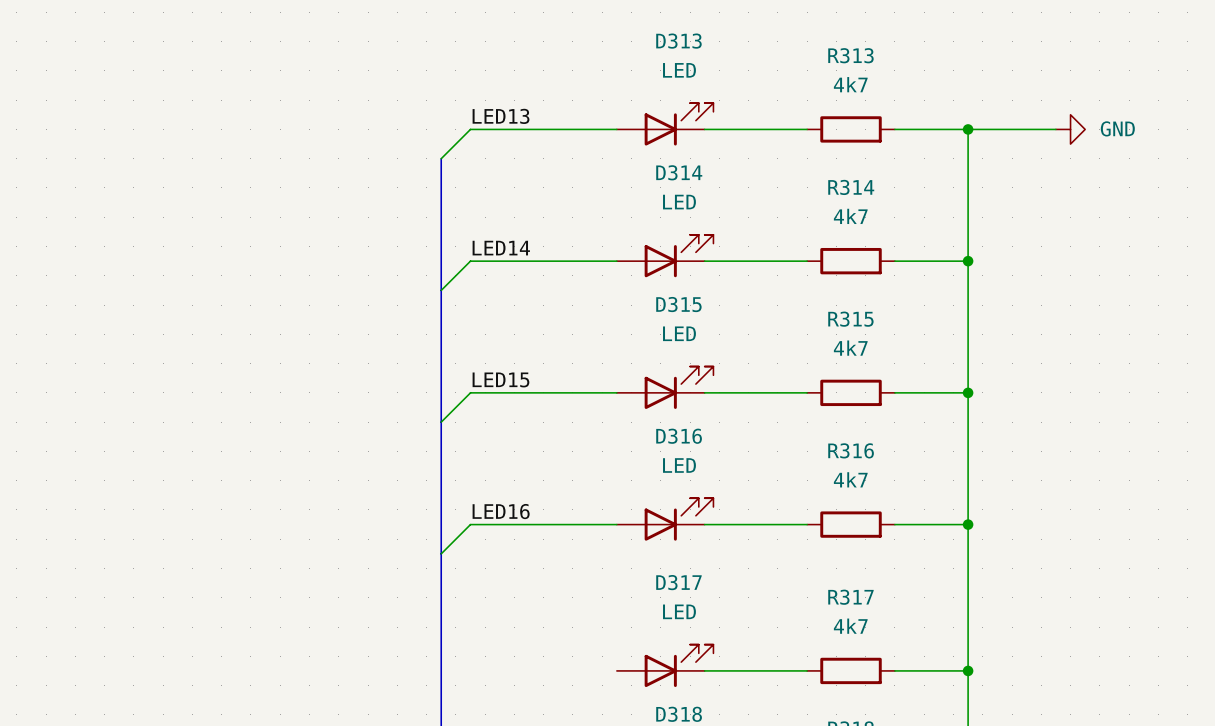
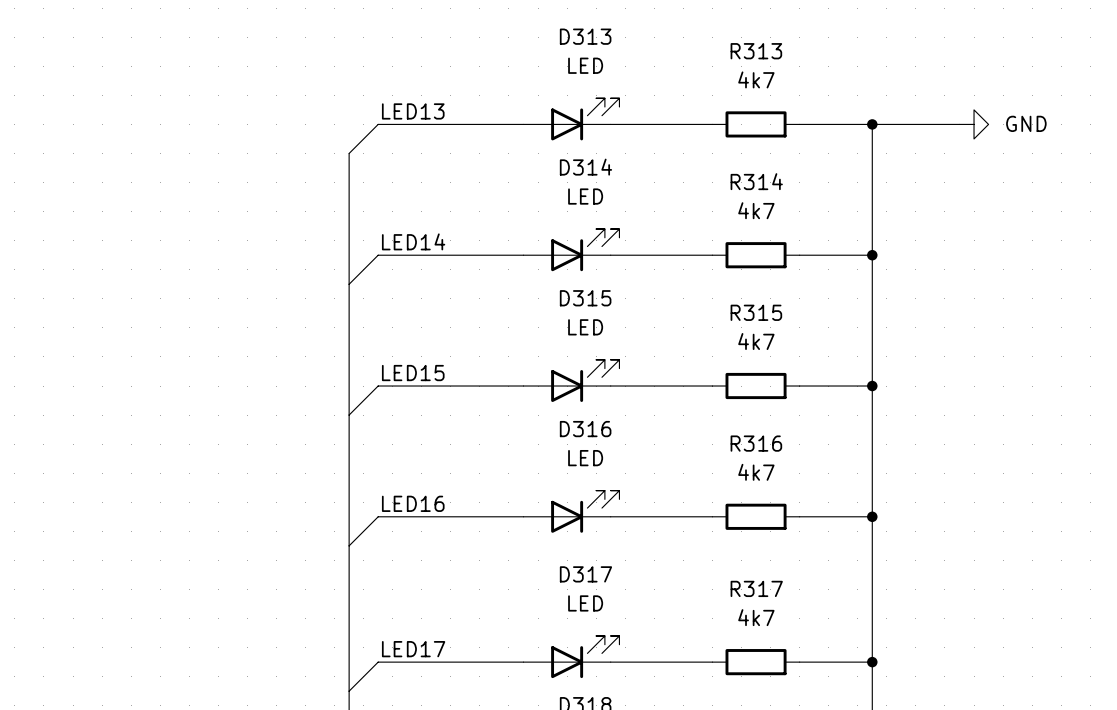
label: none -> LED17 (413, 649)
wire: none -> (523, 662) (378, 662) (349, 691)

